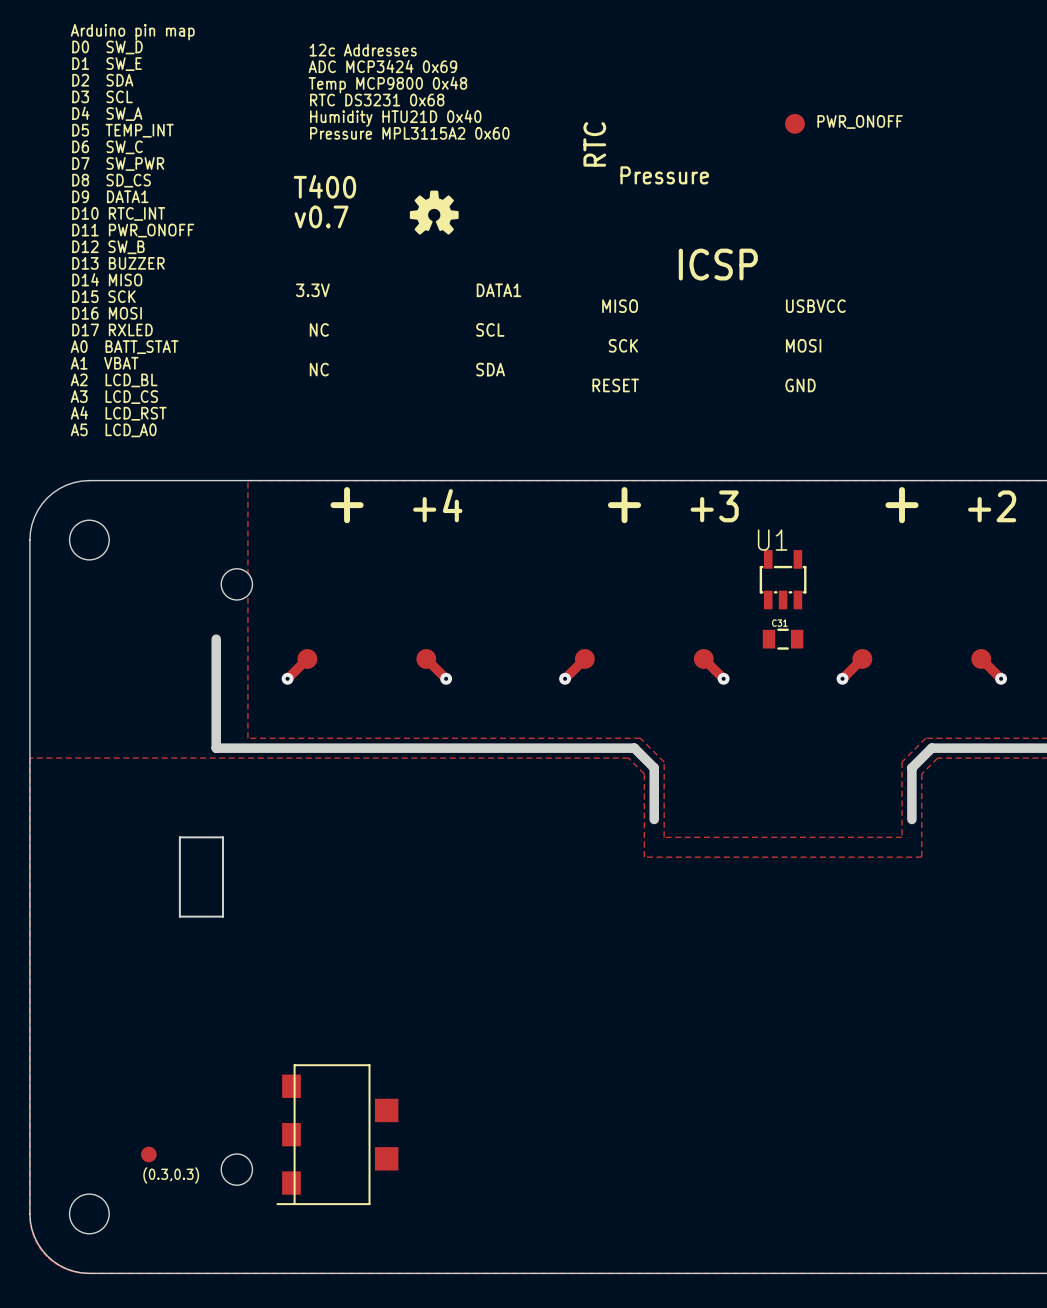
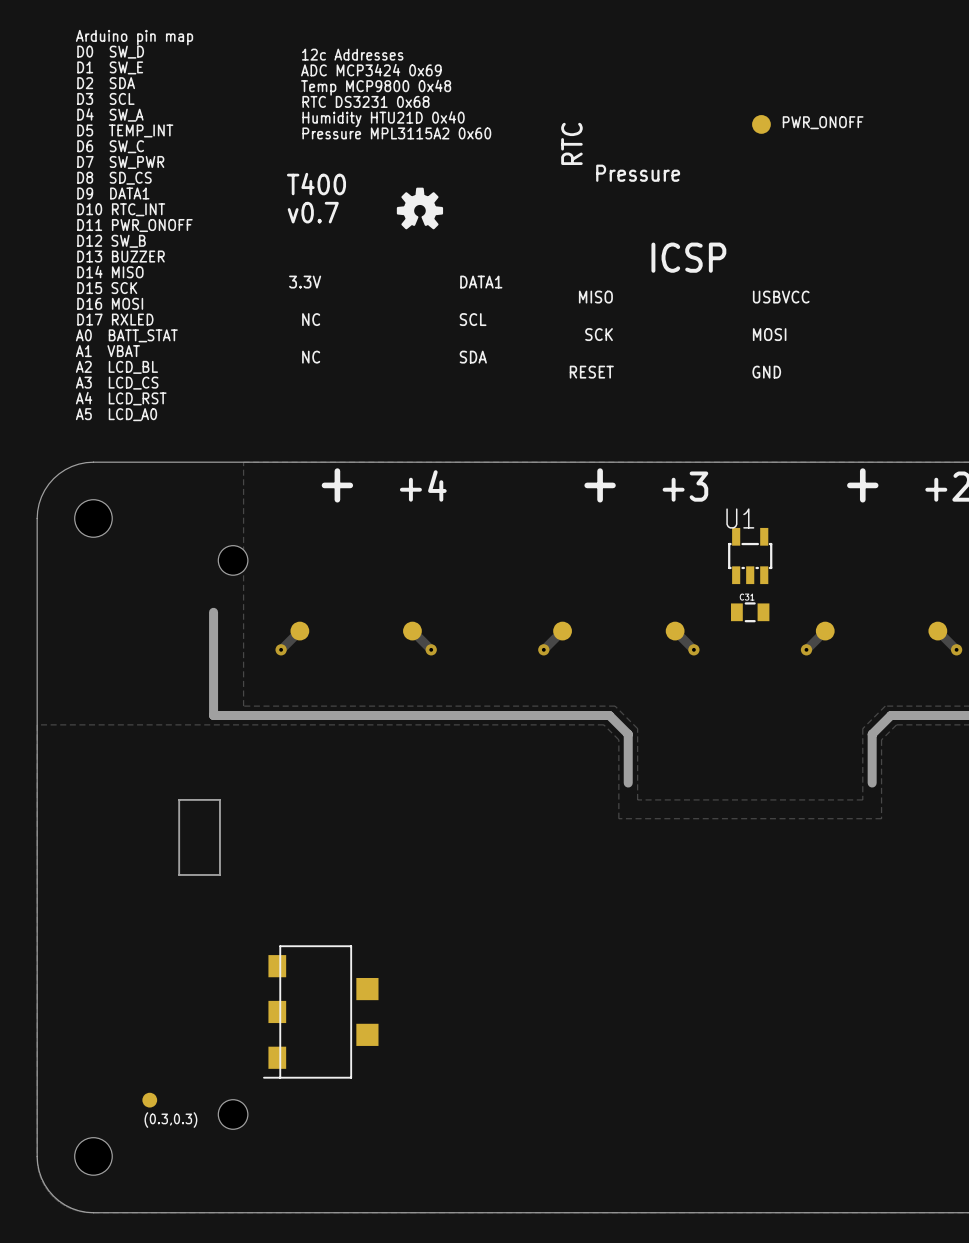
part position: (337, 1134) -> (320, 1011)

